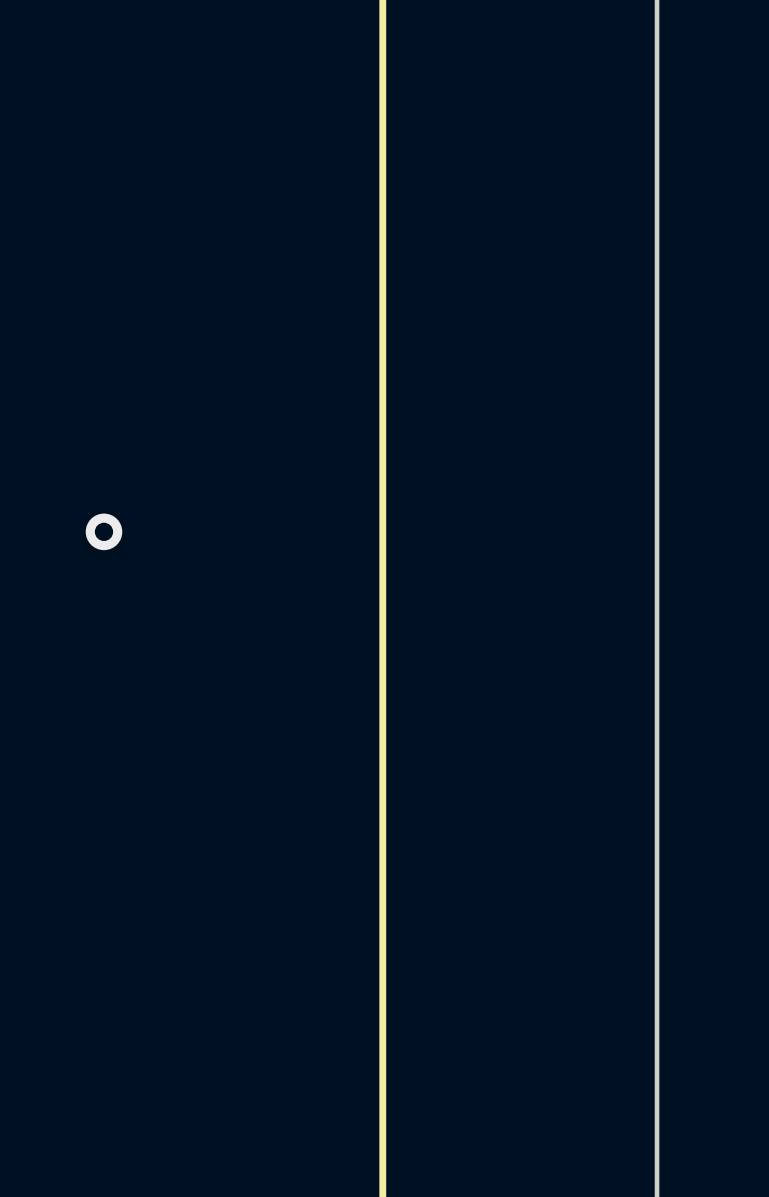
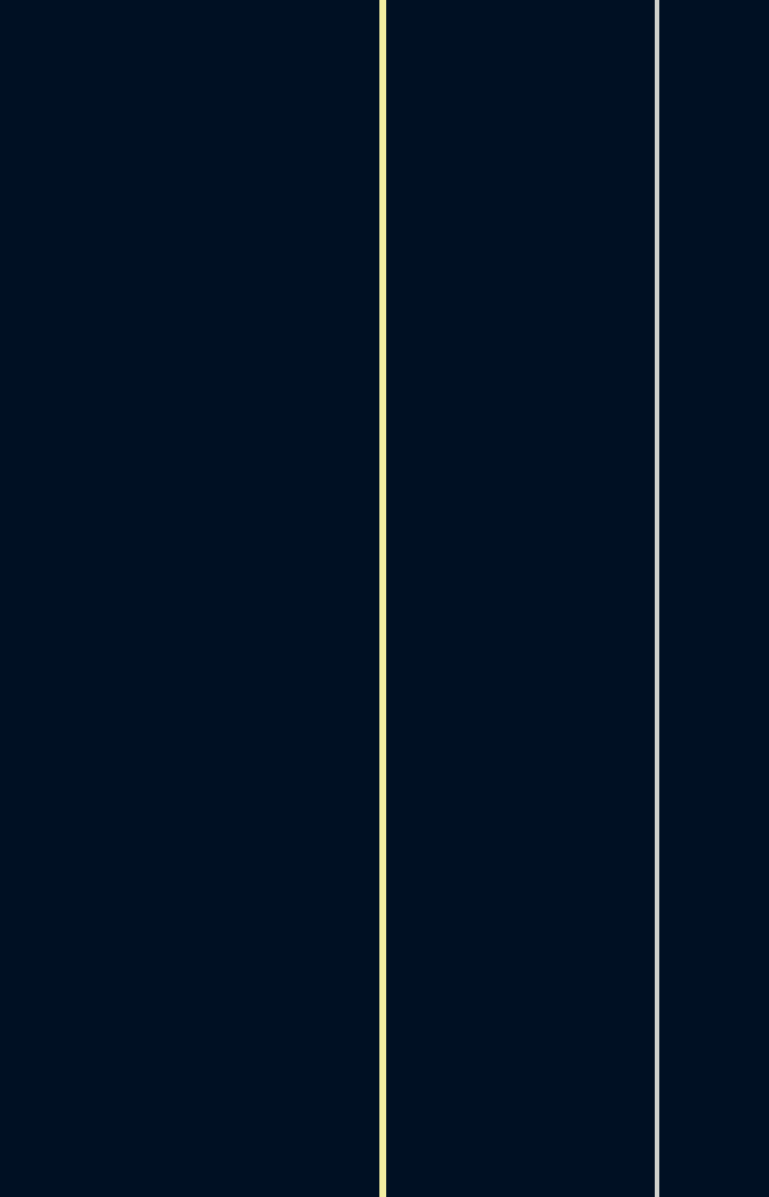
via: (103, 531) -> none

